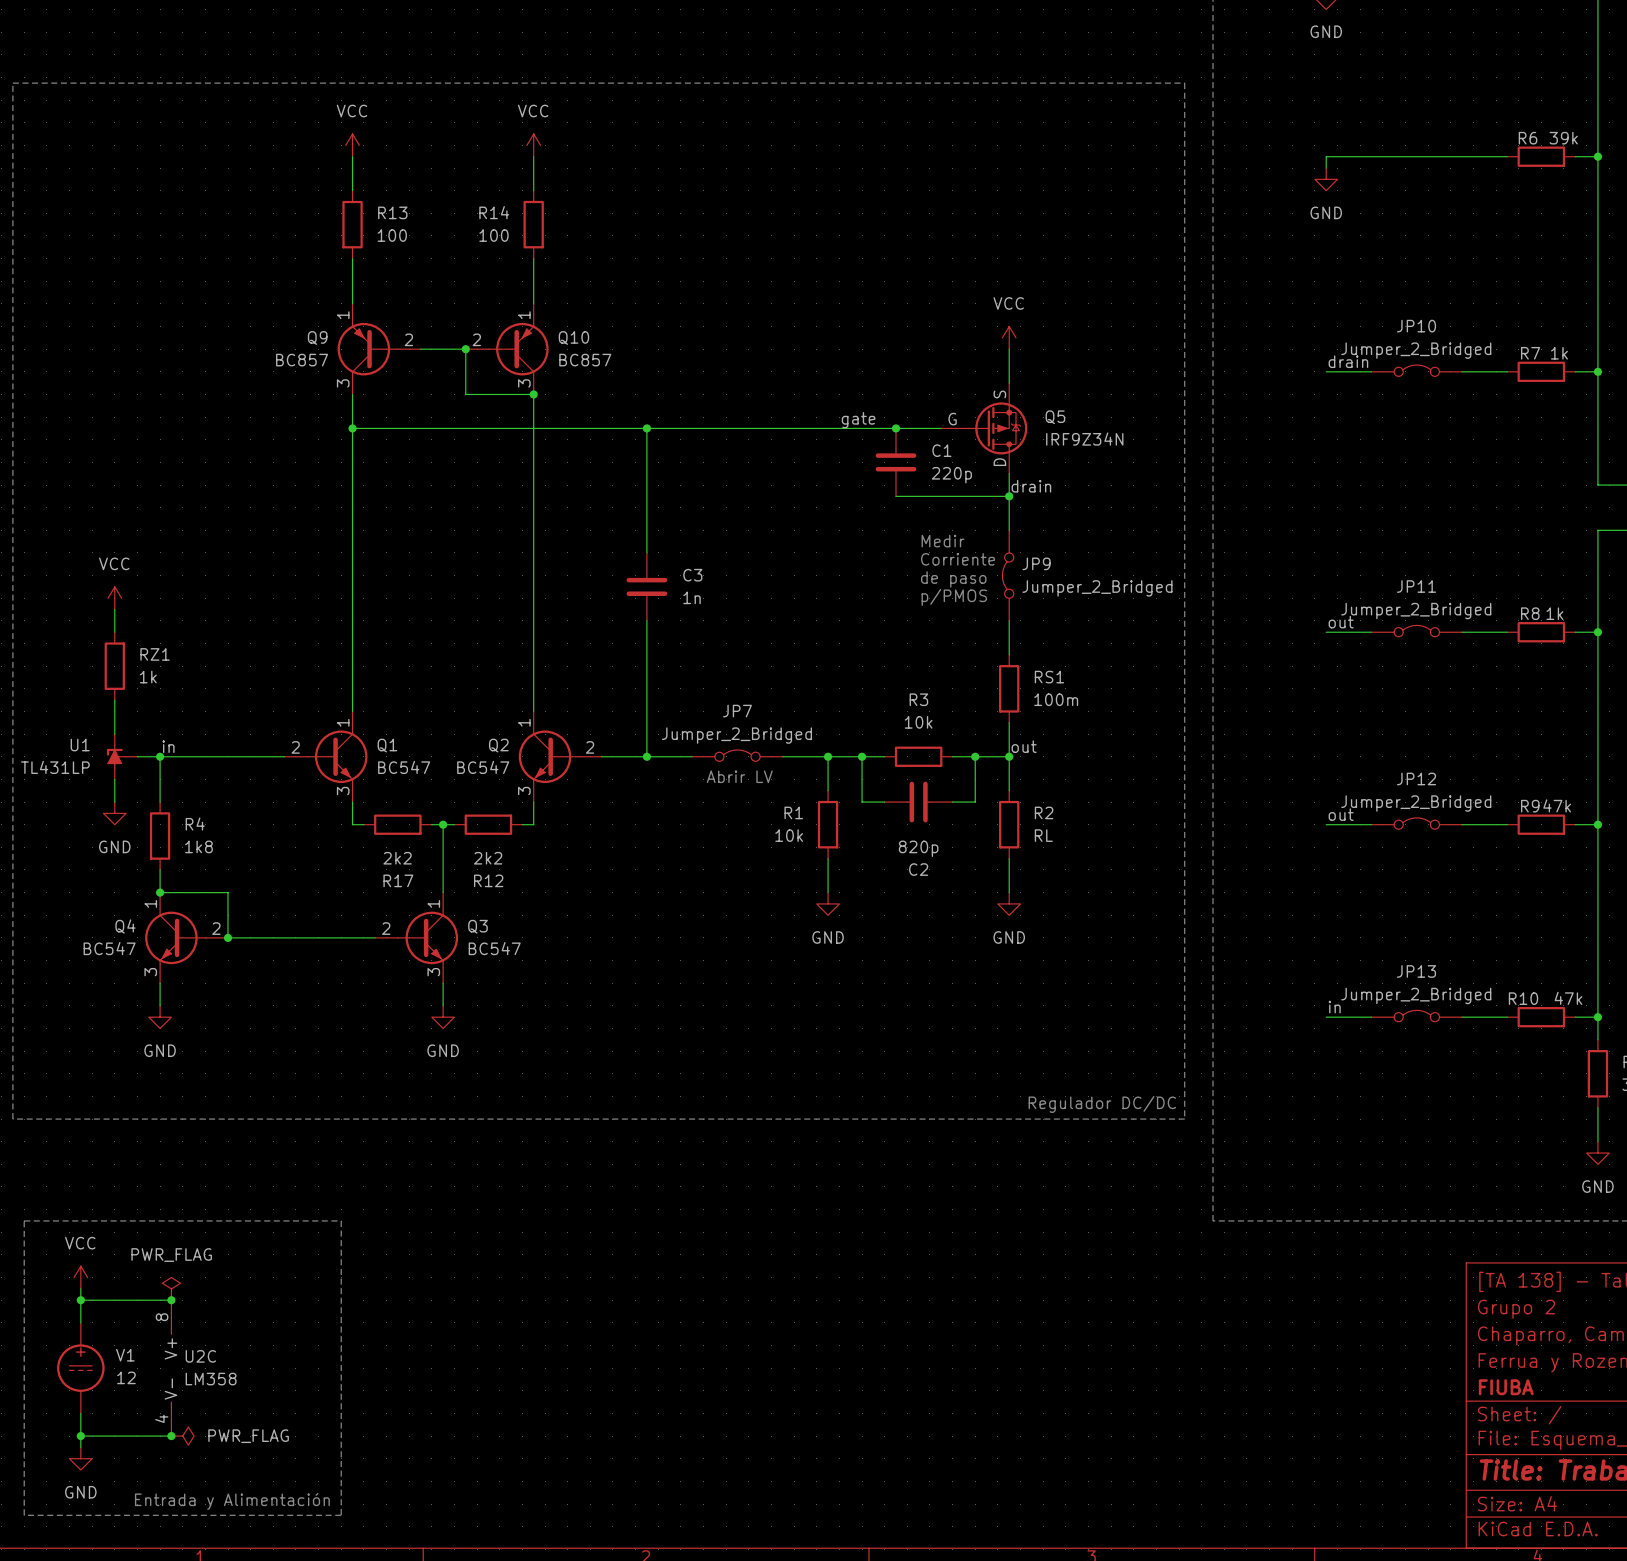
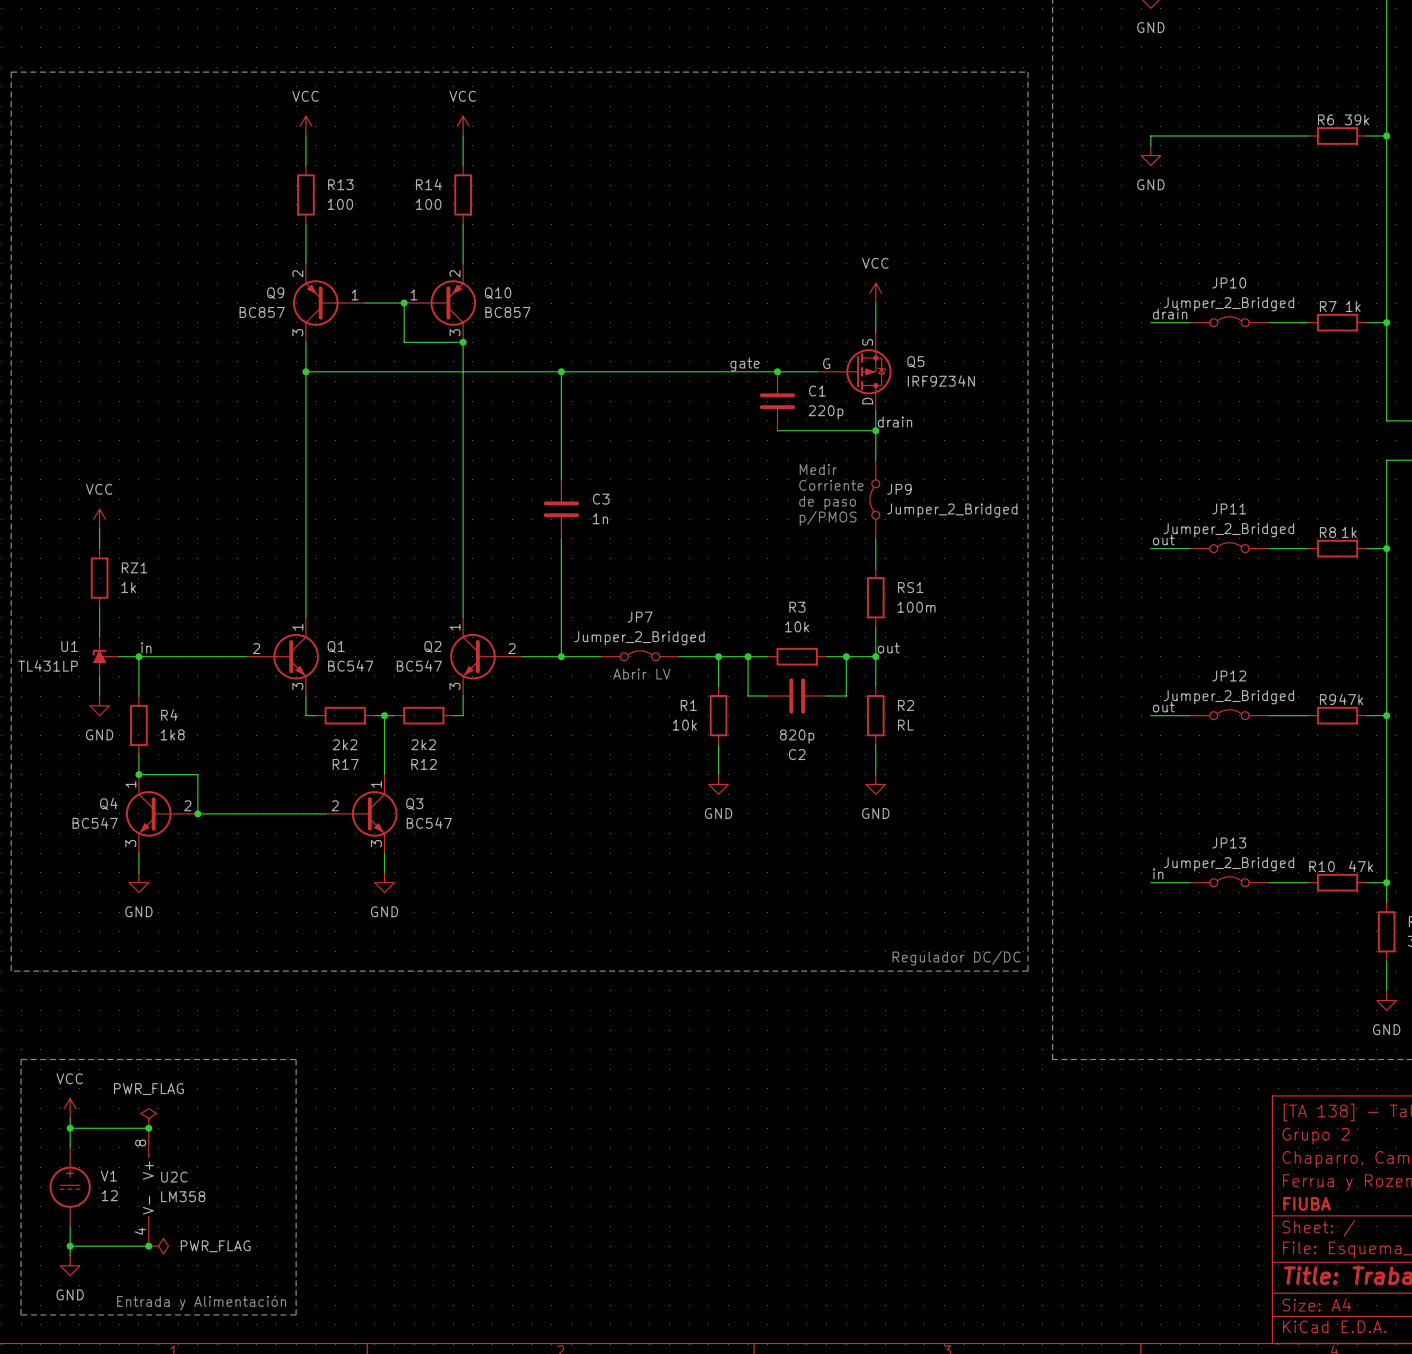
Q9 pin number: 1 (343, 315) -> 2 (297, 273)
Q10 pin number: 1 (524, 315) -> 2 (455, 273)
Q9 pin number: 2 (408, 339) -> 1 (355, 294)
Q10 pin number: 2 (476, 339) -> 1 (414, 294)

